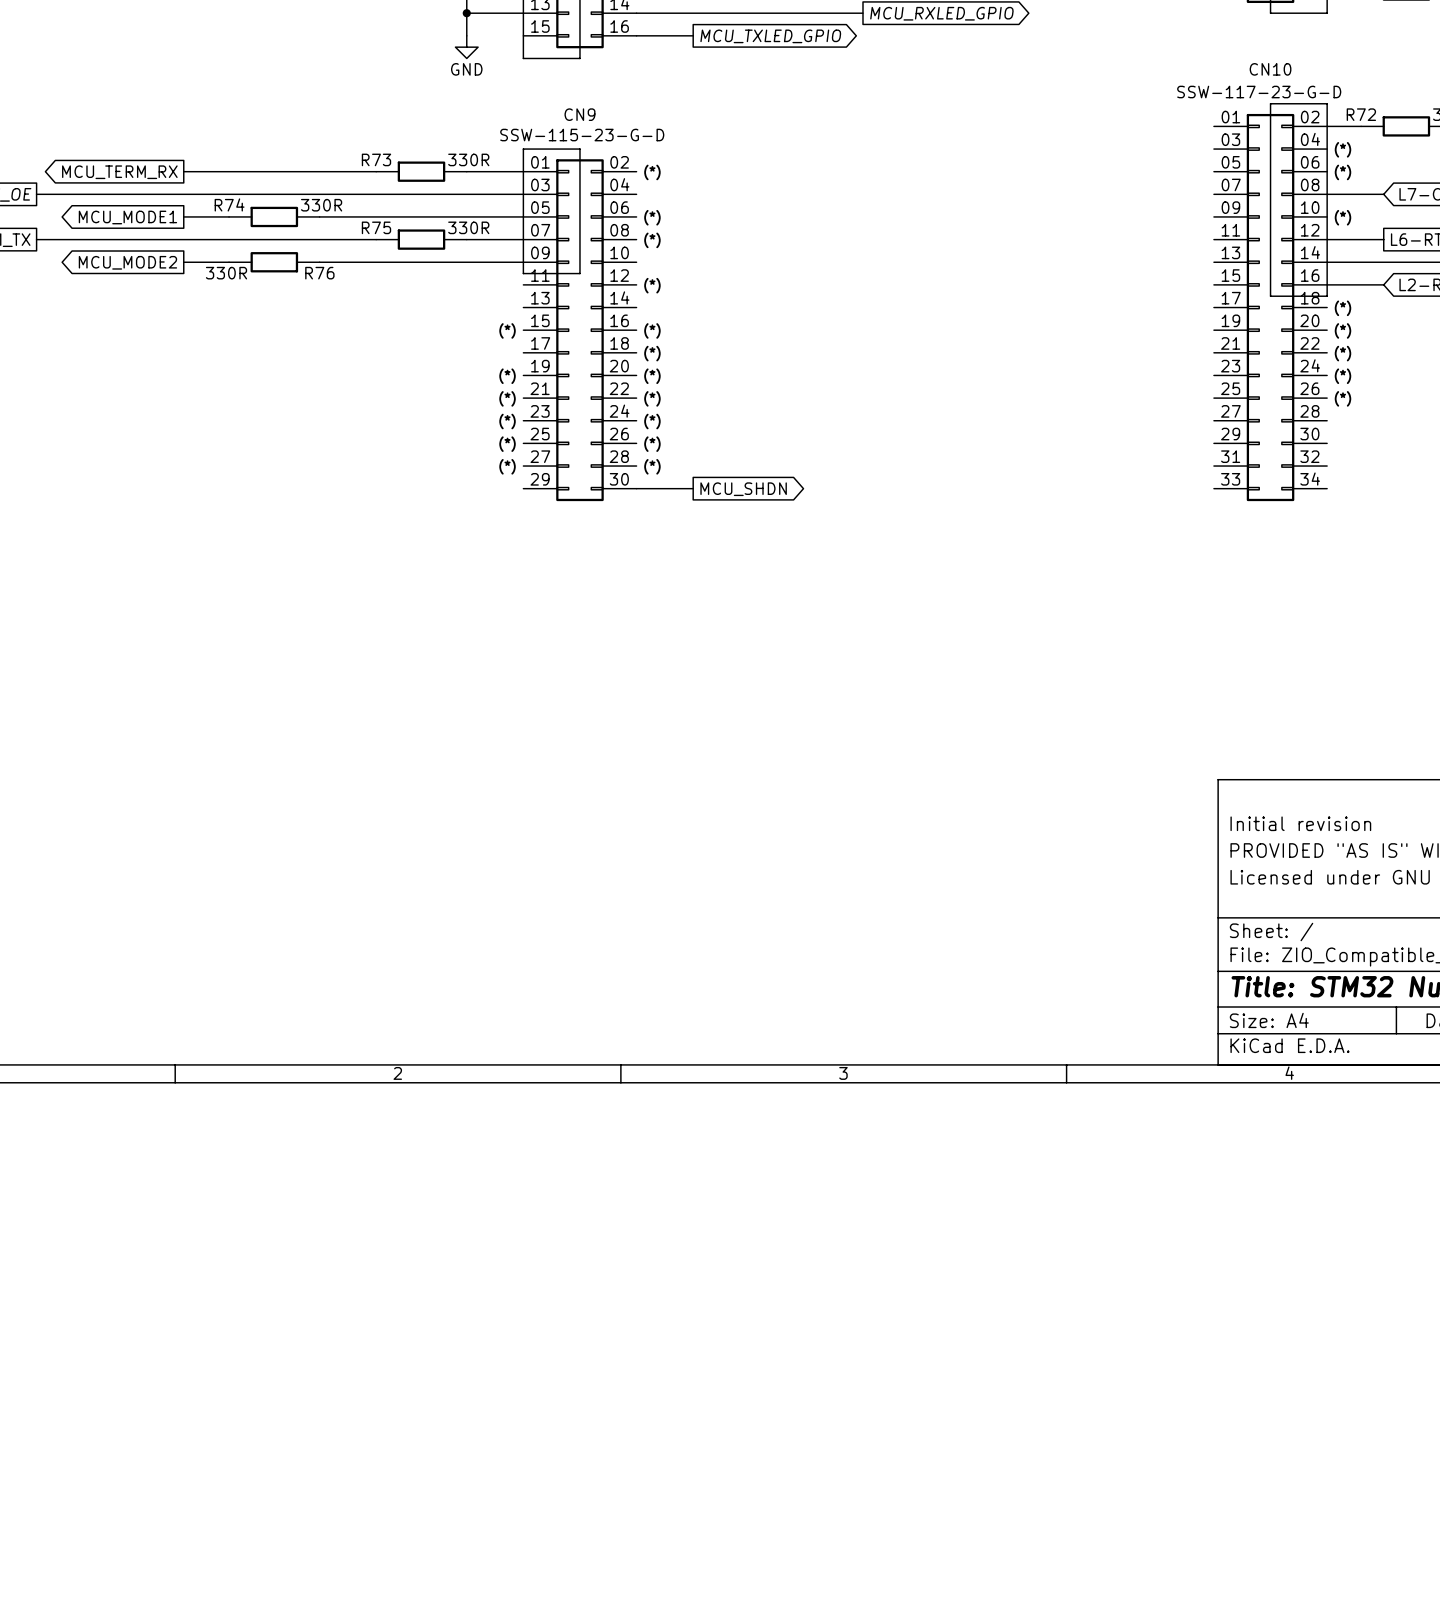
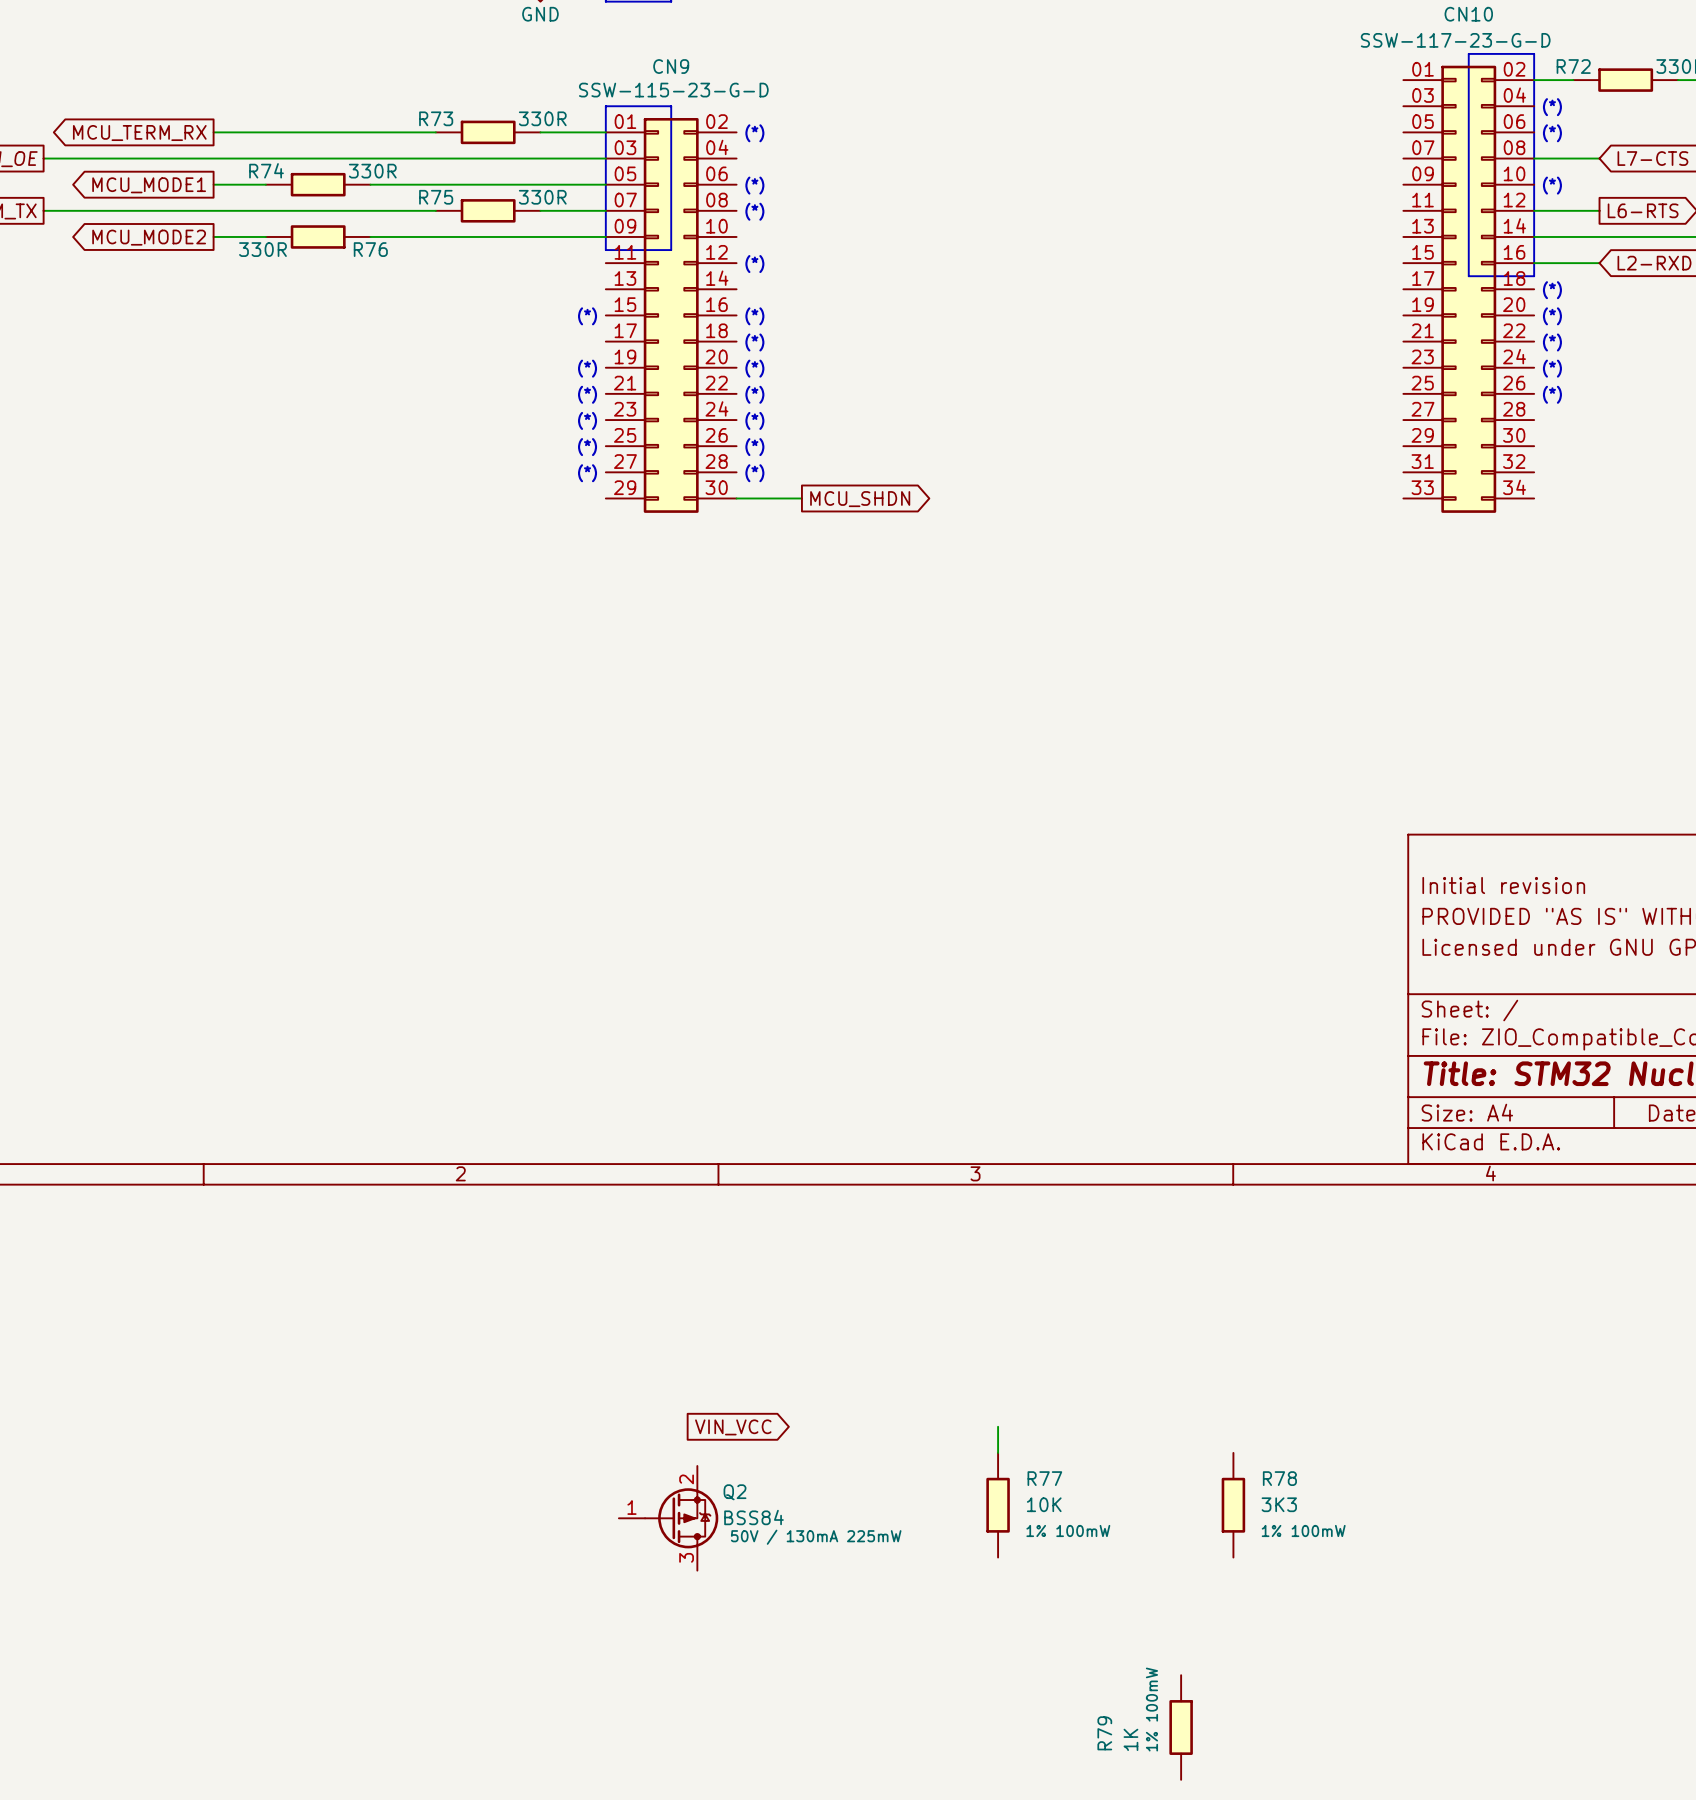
global label: none -> VIN_VCC (733, 1427)
wire: none -> (998, 1426) (998, 1452)
R77: none -> 10K (998, 1505)
R78: none -> 3K3 (1233, 1505)
Q2: none -> BSS84 (668, 1518)
R79: none -> 1K (1181, 1727)

